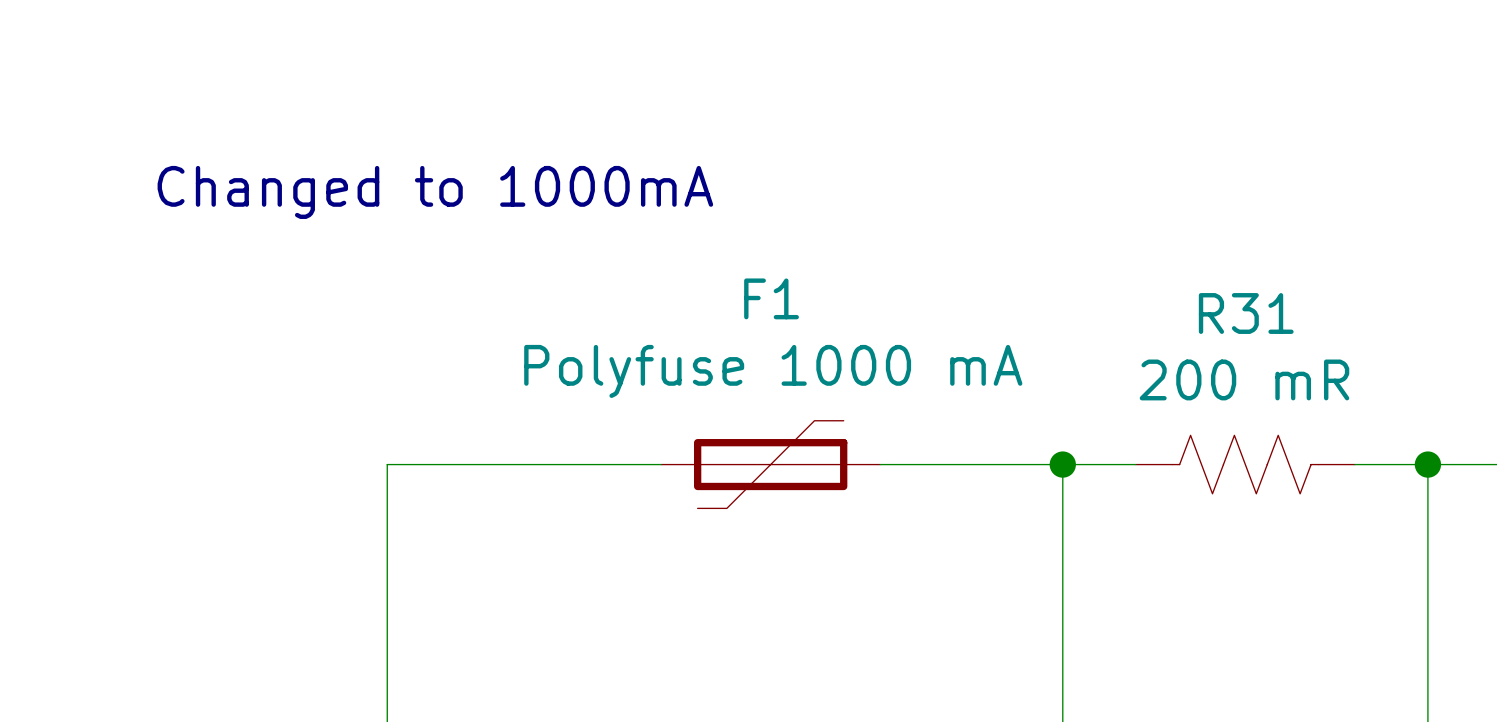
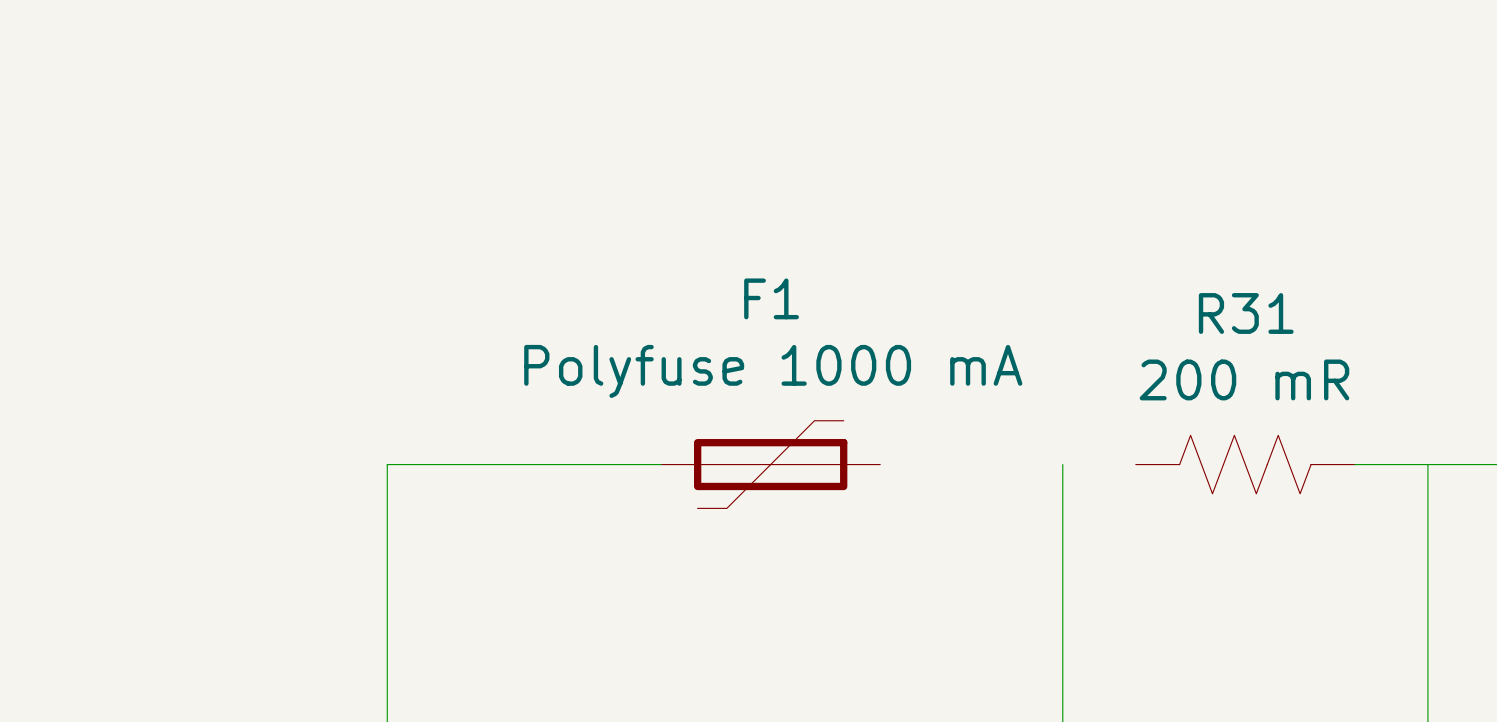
text: Changed to 1000mA (435, 192) -> none
wire: (880, 464) (1135, 464) -> none
junction: (1062, 464) -> none
junction: (1427, 464) -> none

